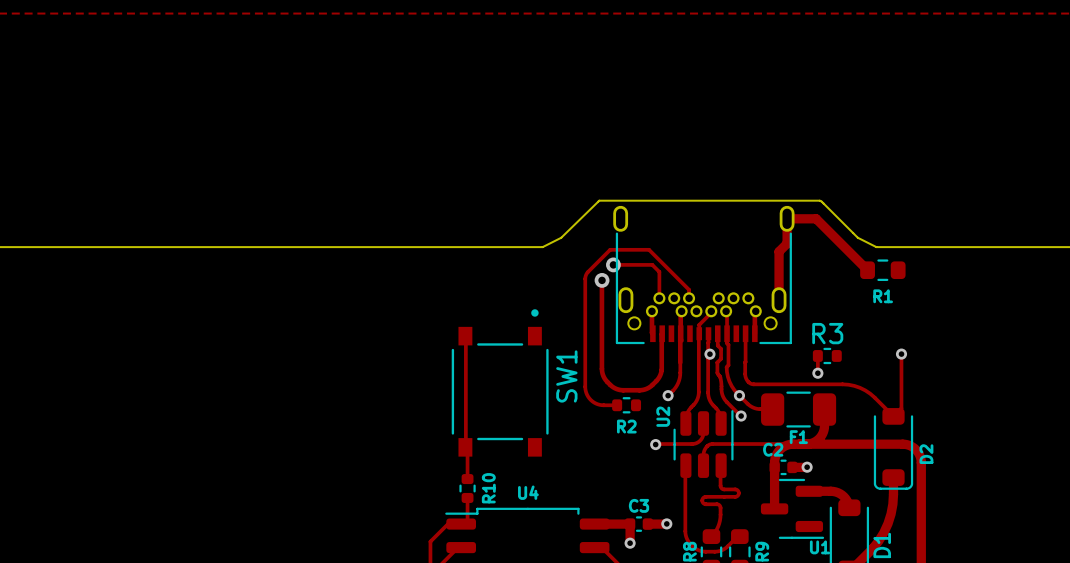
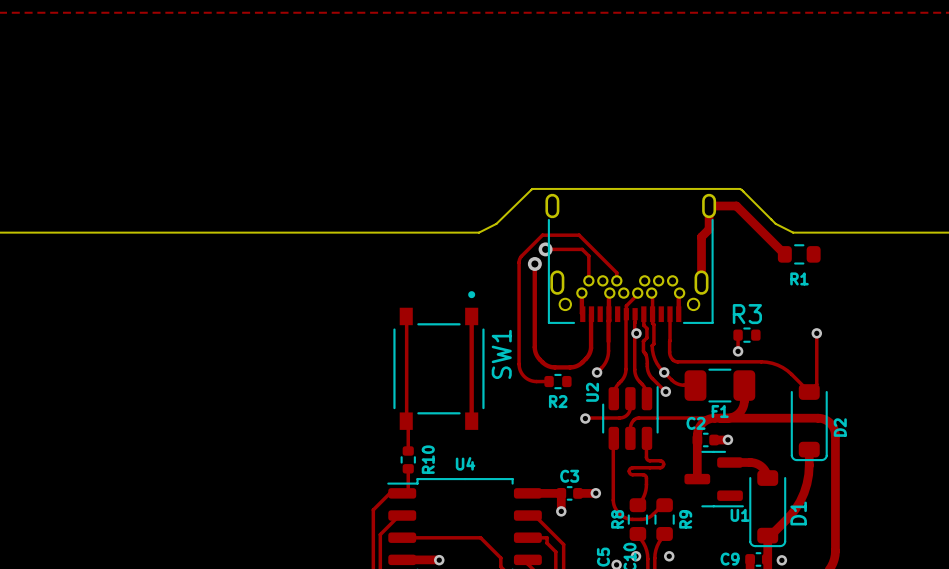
track: none -> (471, 316) (471, 421)

